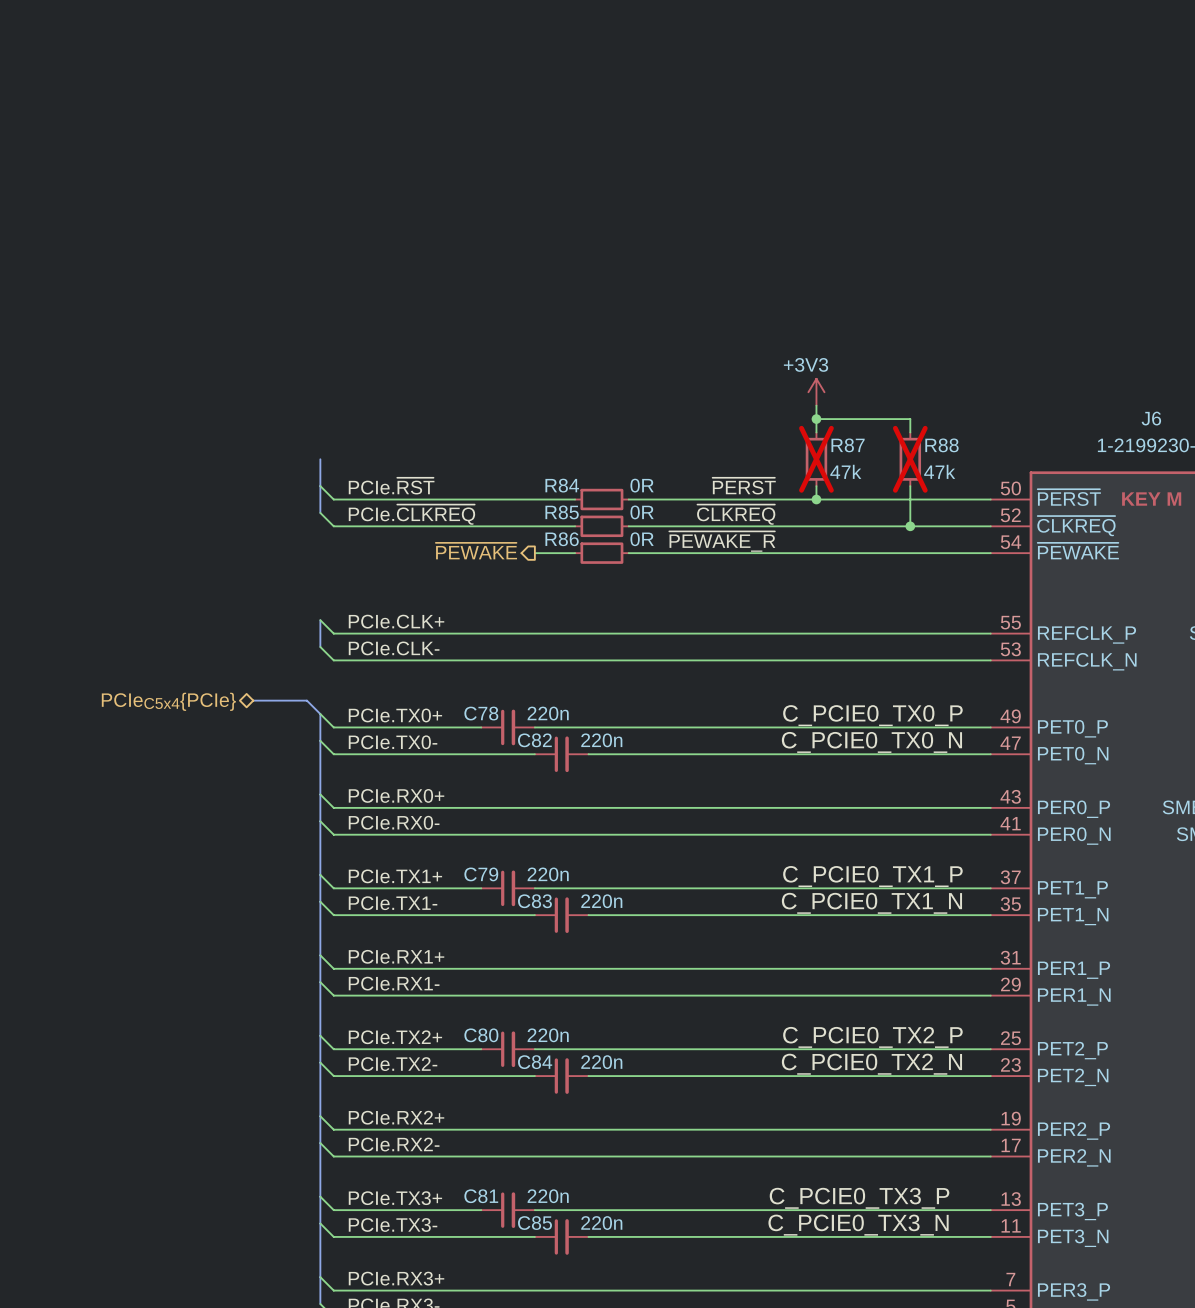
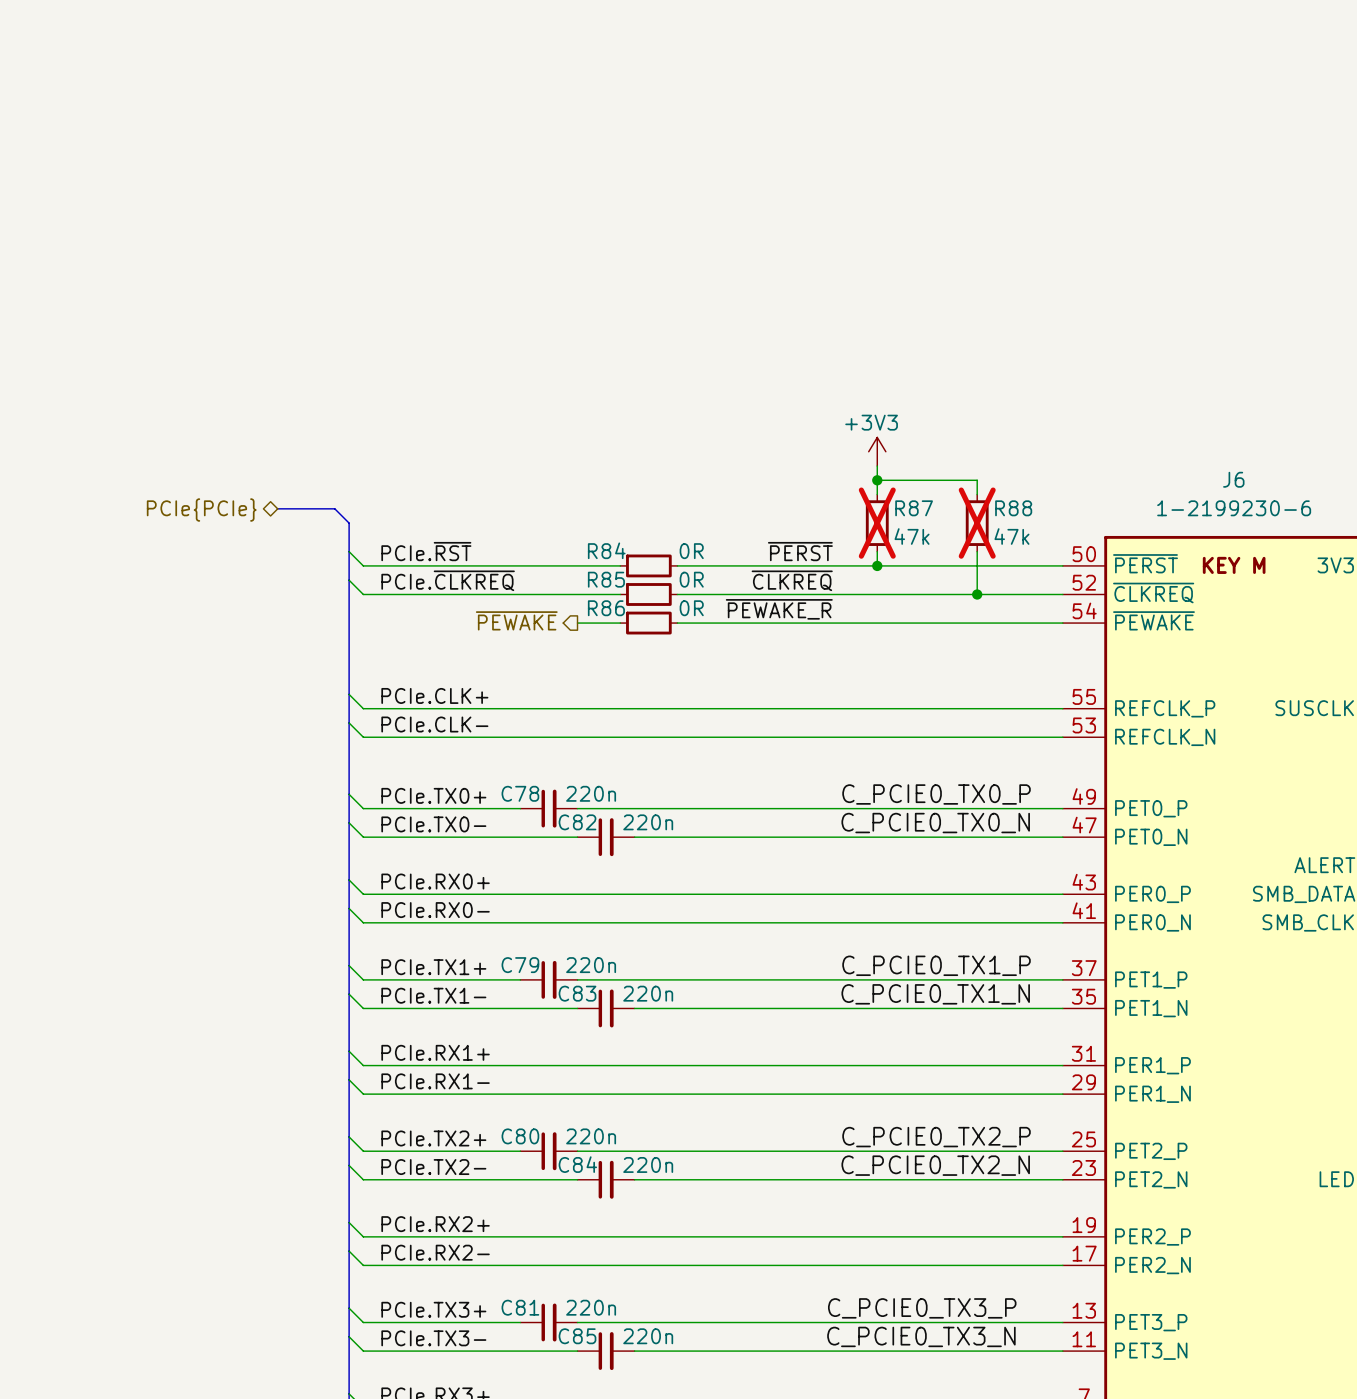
bus: none -> (277, 508) (334, 508) (349, 523)
hierarchical label: none -> PCIe{PCIe} (201, 510)
bus: none -> (349, 580) (349, 694)
bus: (253, 700) (306, 700) (320, 714) -> (349, 722) (349, 794)
hierarchical label: PCIeC5x4{PCIe} (168, 701) -> none

